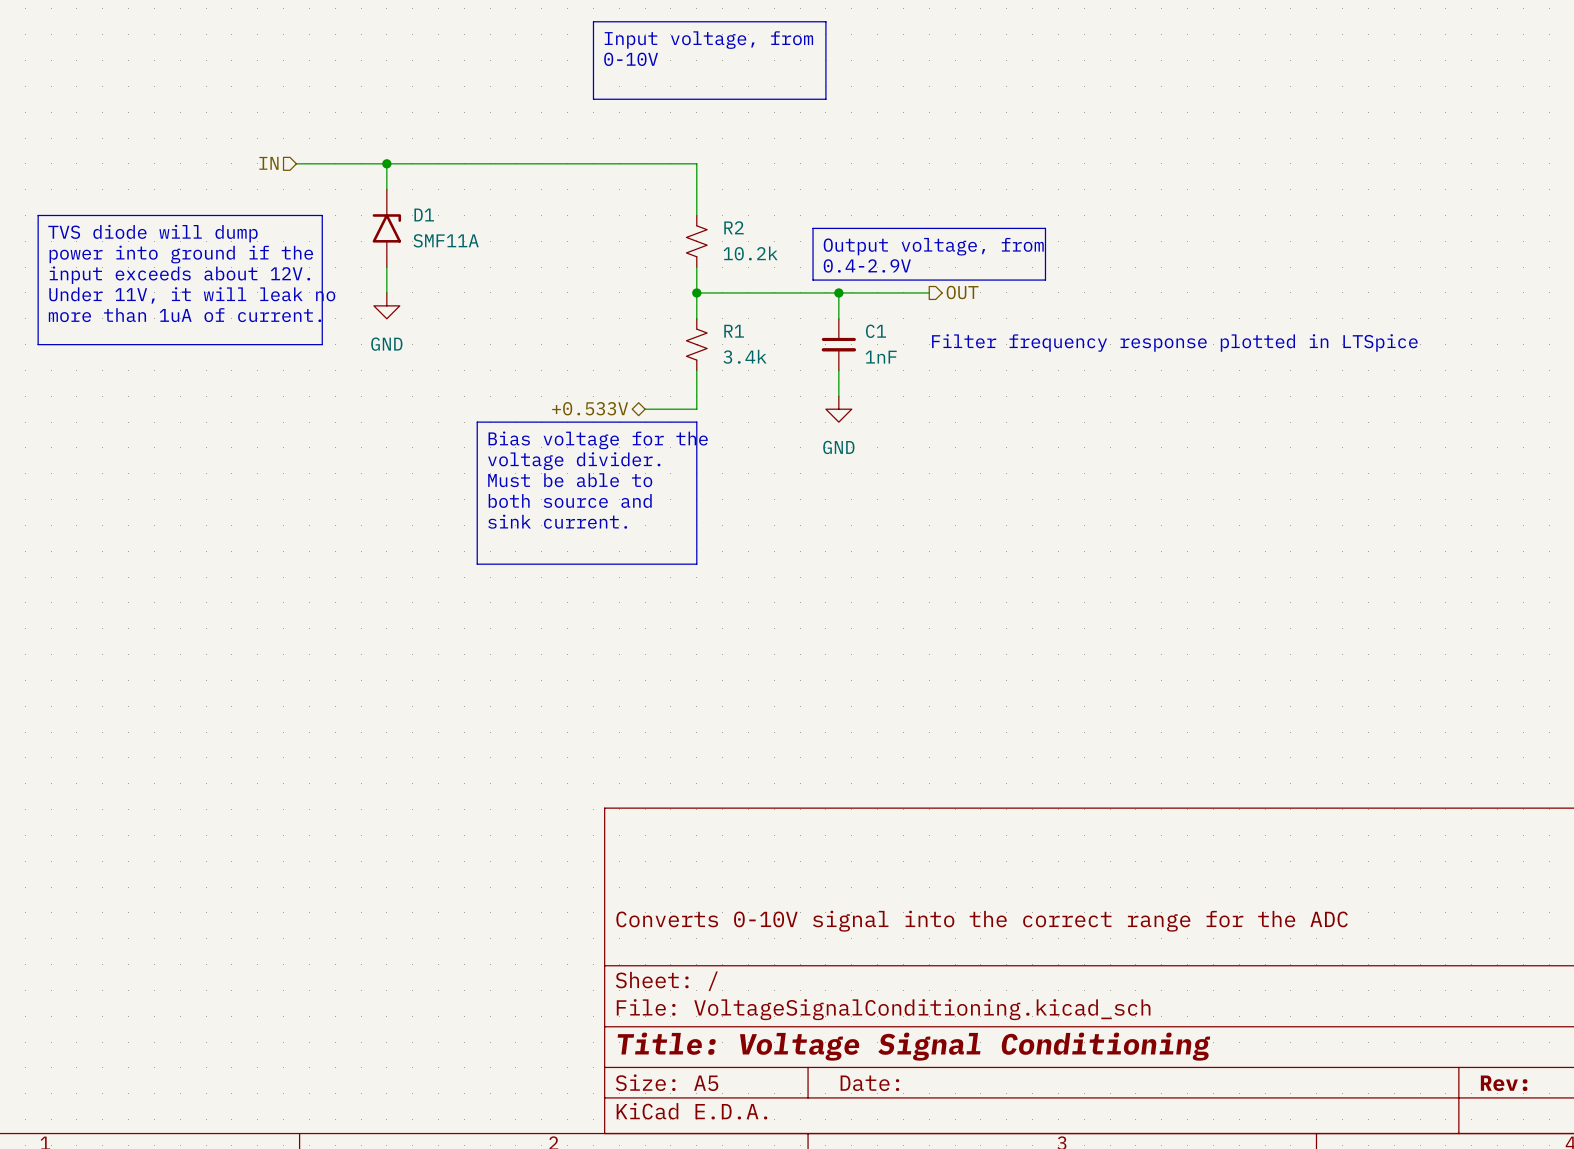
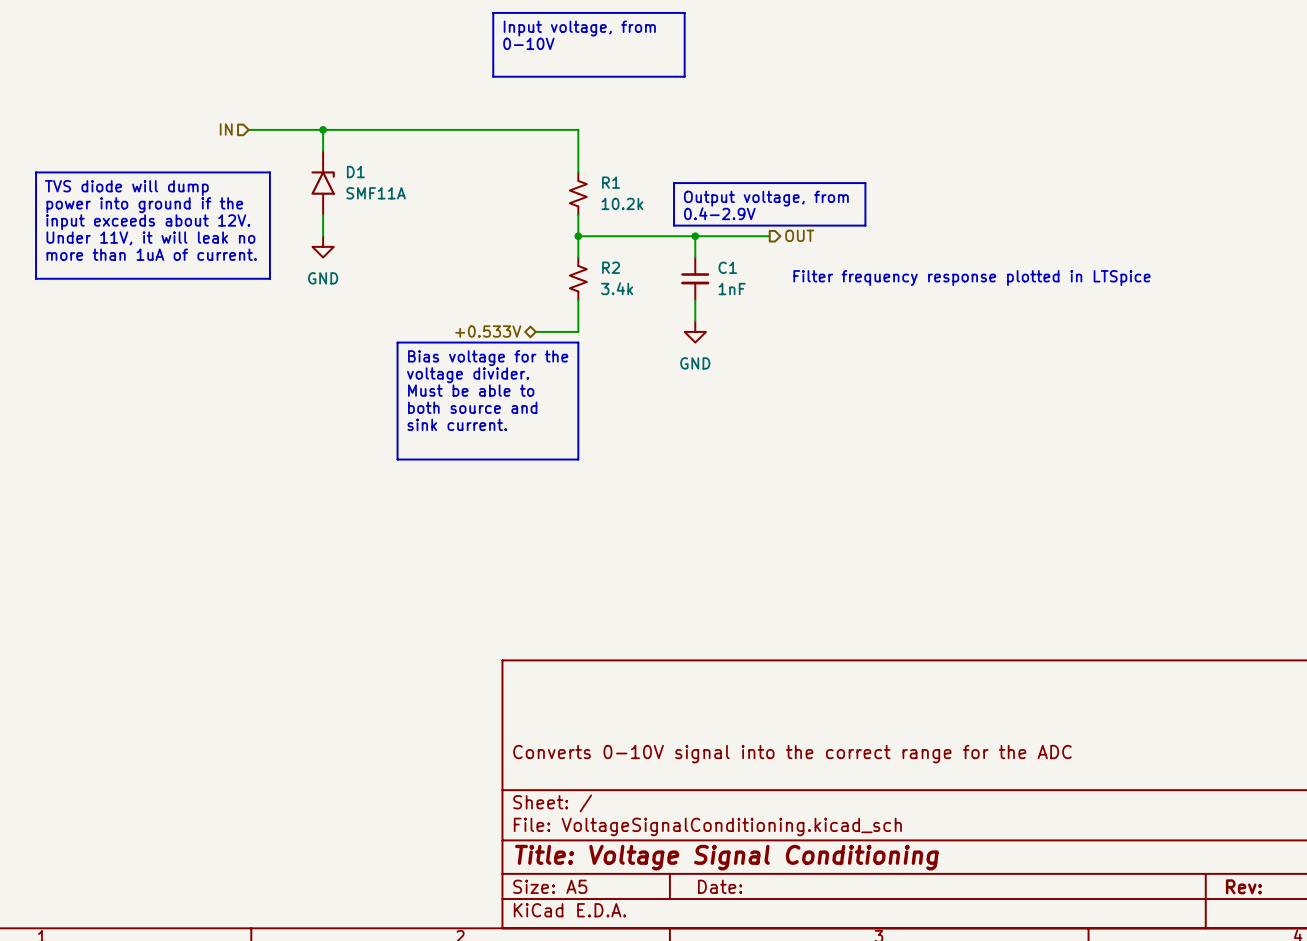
R2 name: R2 (733, 227) -> R1 (611, 182)
R1 name: R1 (734, 331) -> R2 (611, 267)

